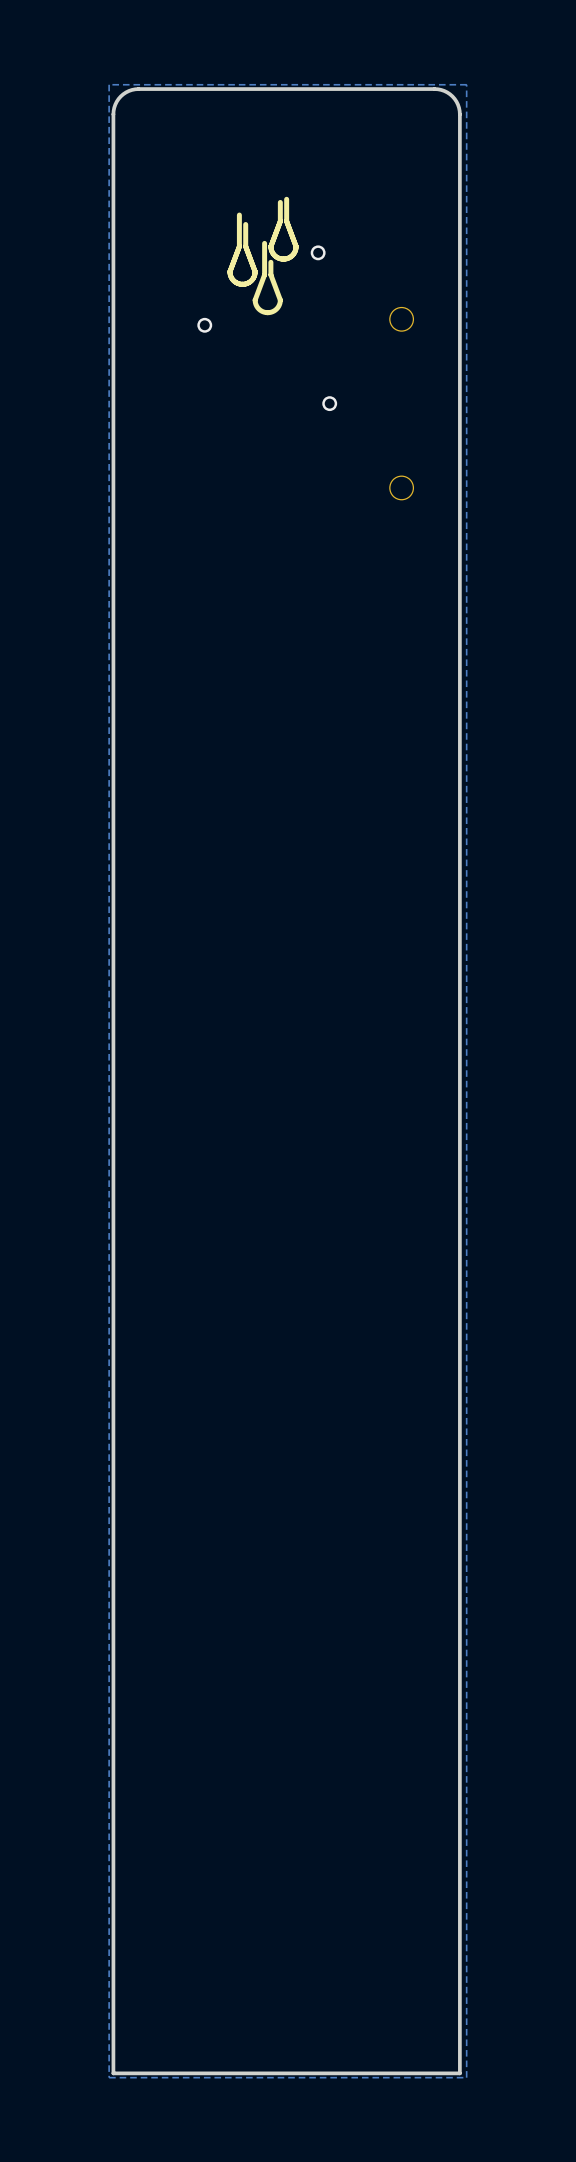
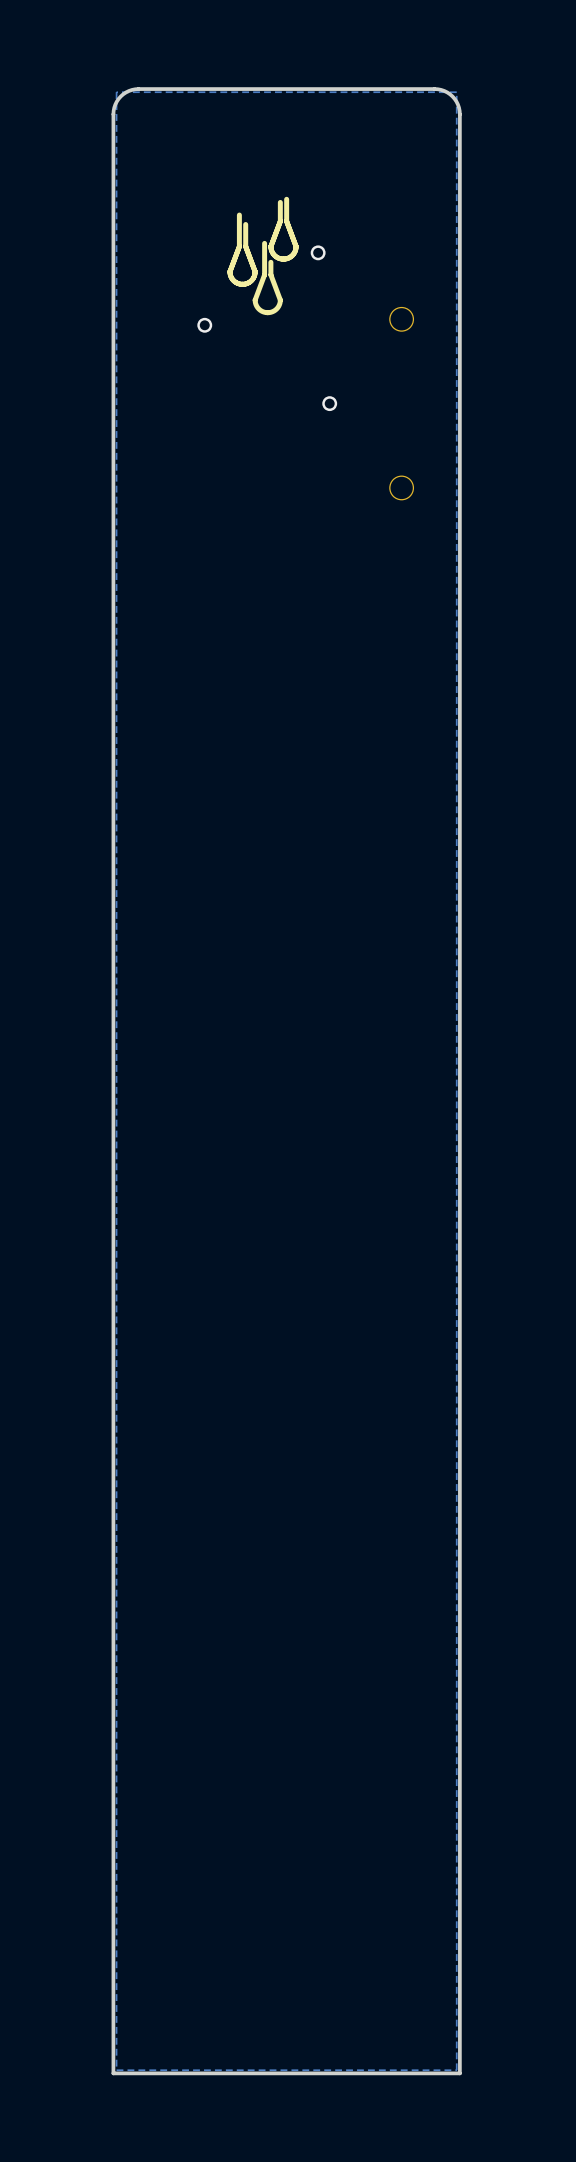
zone outline: (466, 84) (466, 2077) (109, 2077) (109, 84) (466, 84) -> (456, 92) (456, 2070) (116, 2070) (116, 92) (456, 92)

